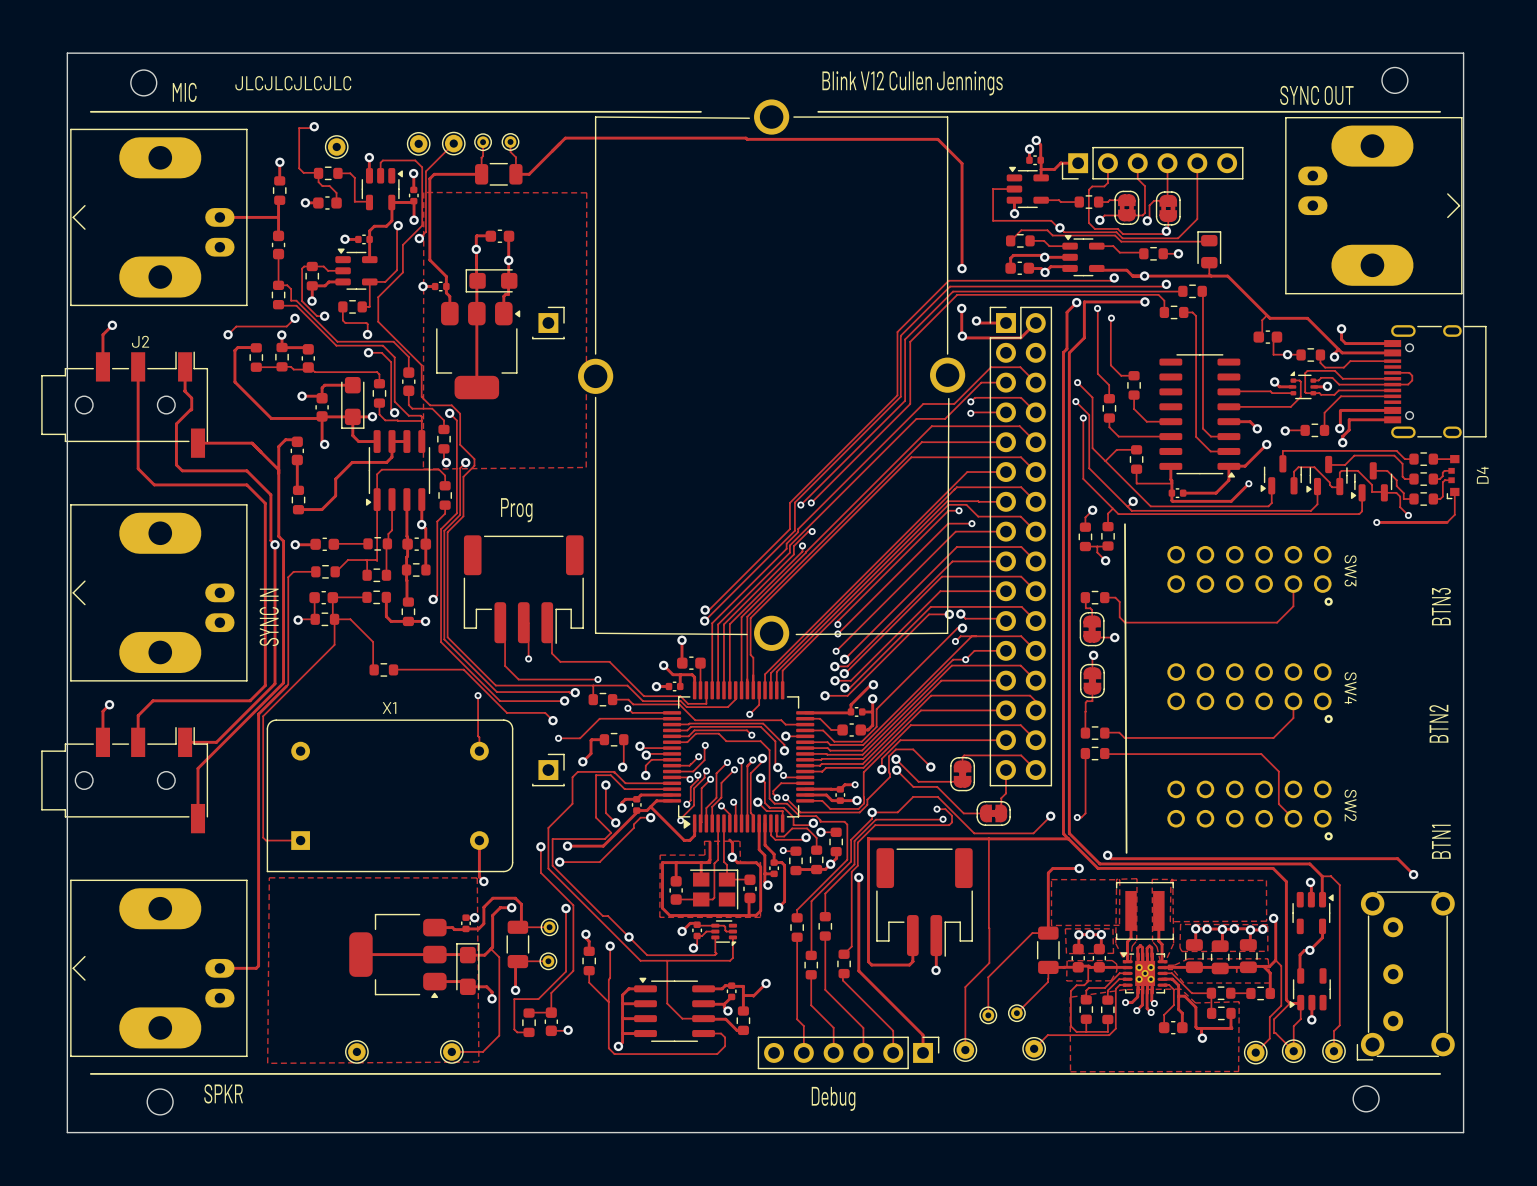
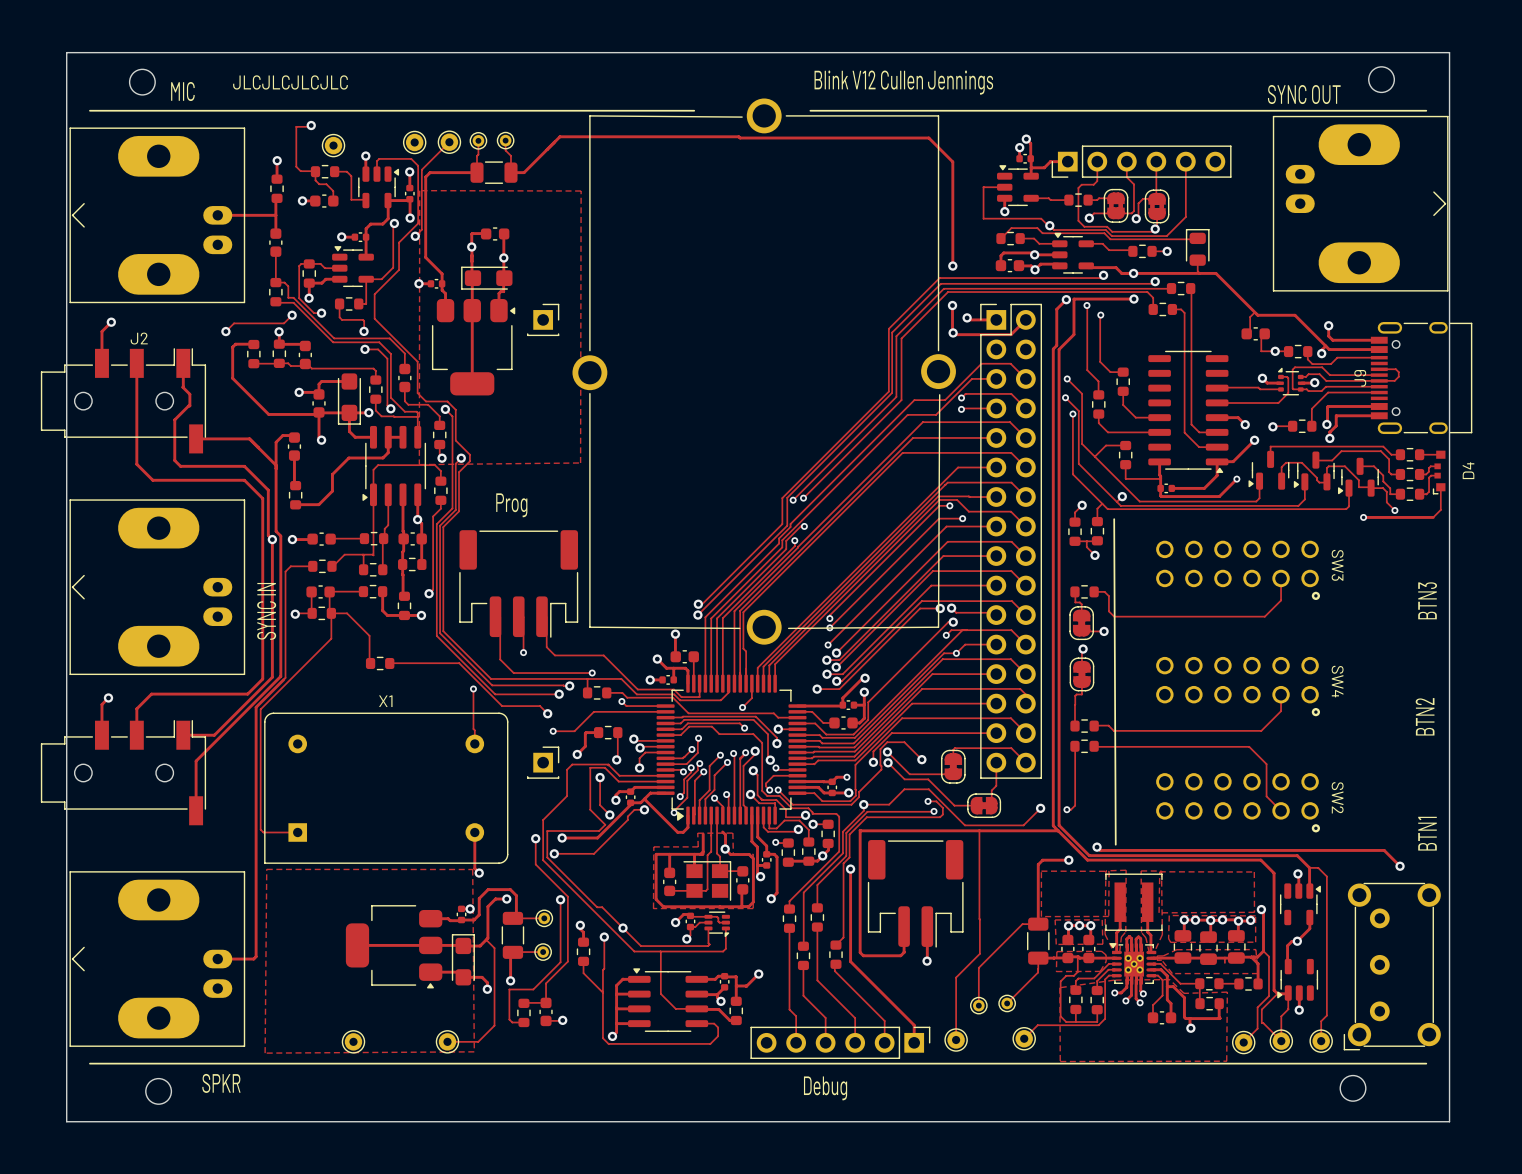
J9 name: none -> J9 (1360, 378)

